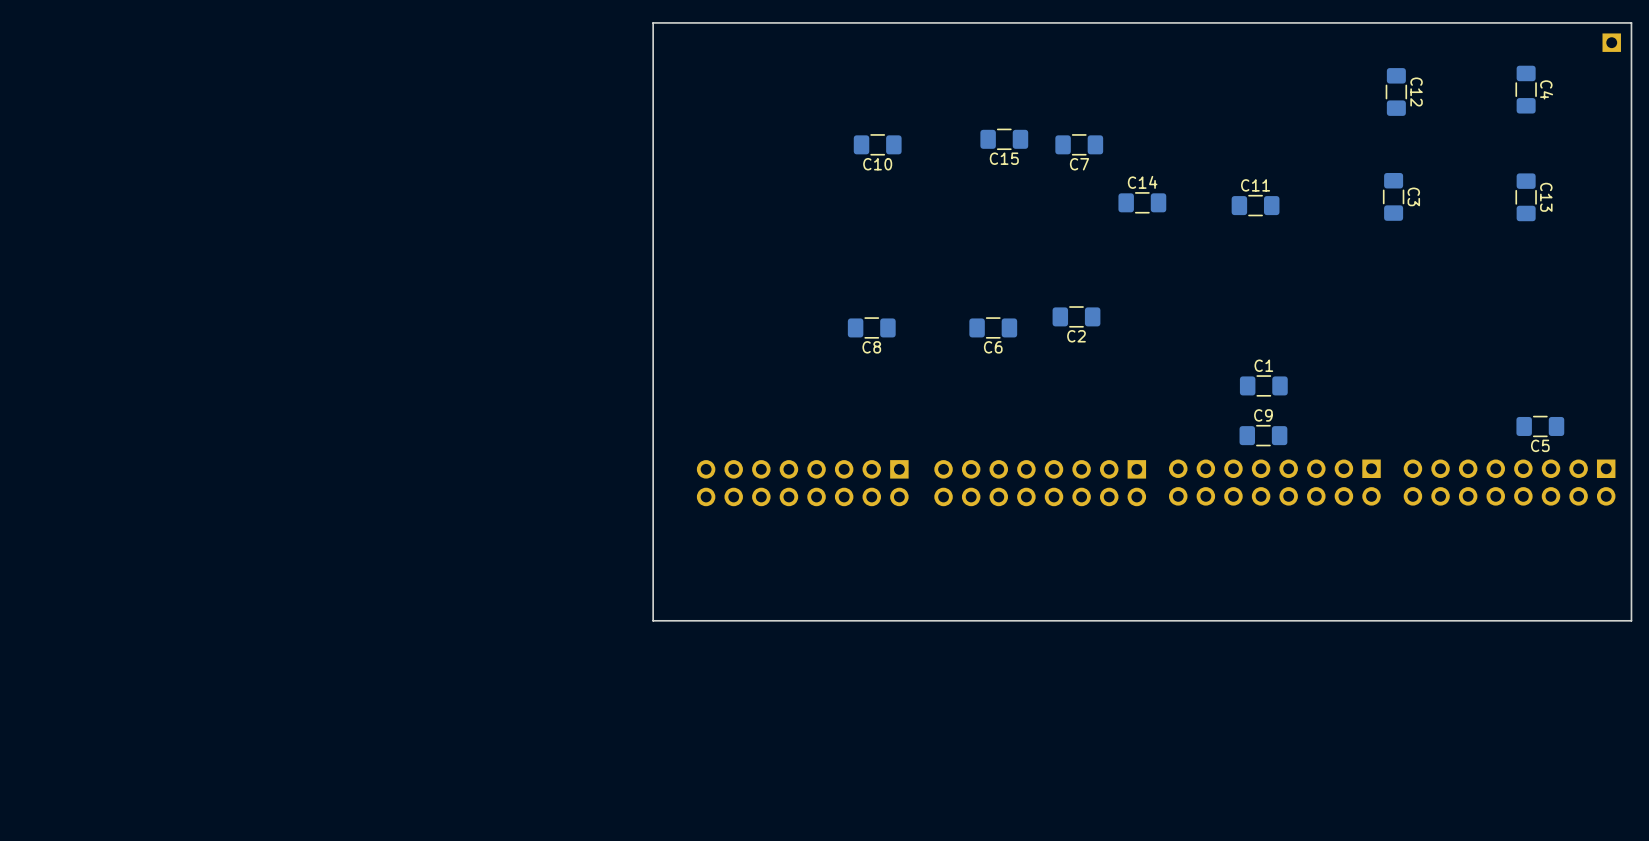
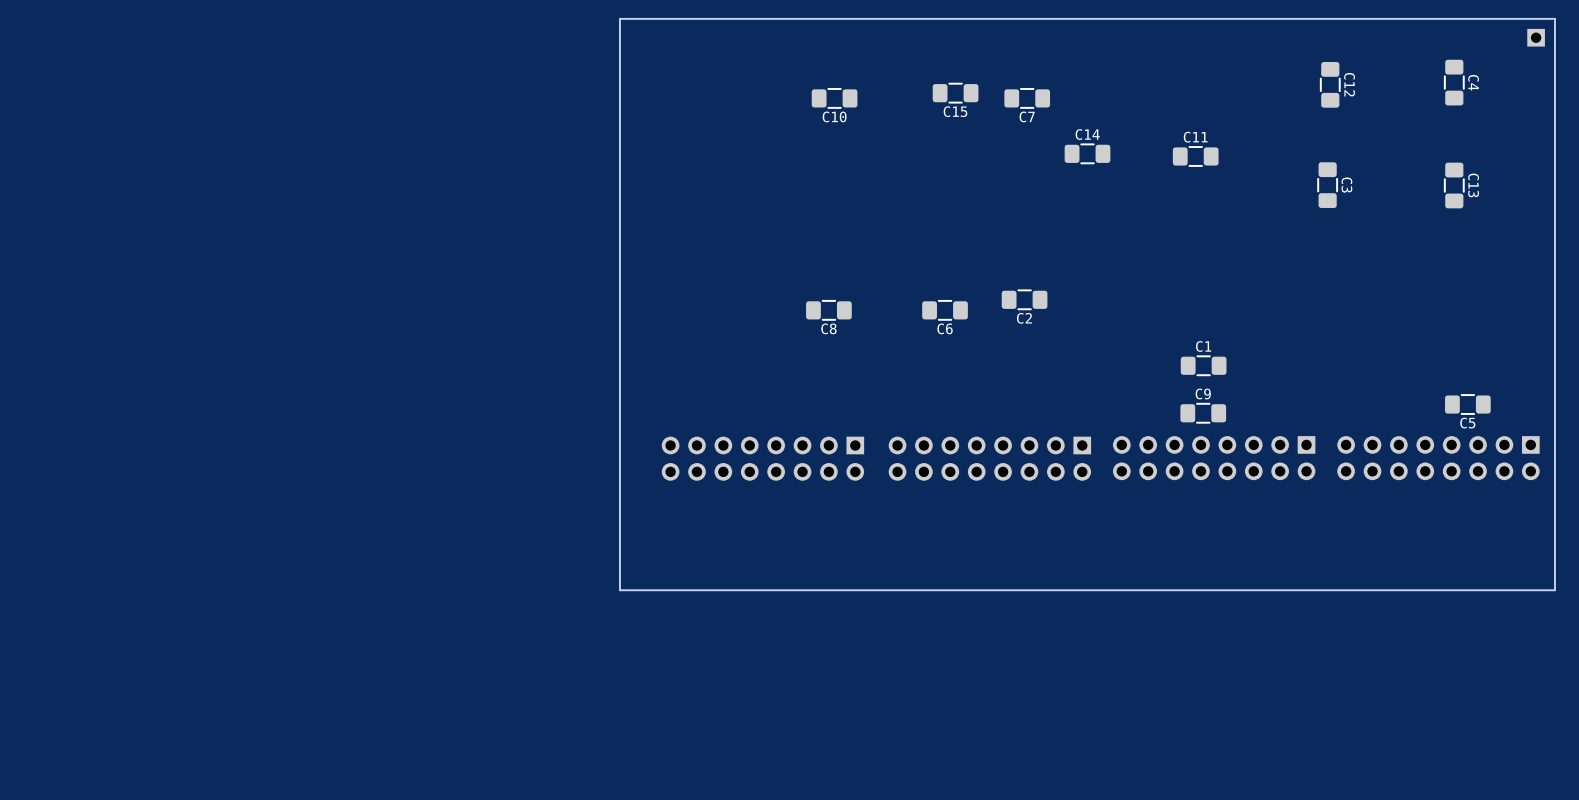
C15 position: (1004, 139) -> (955, 93)
C10 position: (877, 144) -> (834, 98)
C7 position: (1079, 144) -> (1027, 98)
C14 position: (1142, 202) -> (1087, 153)
C11 position: (1255, 205) -> (1195, 156)

